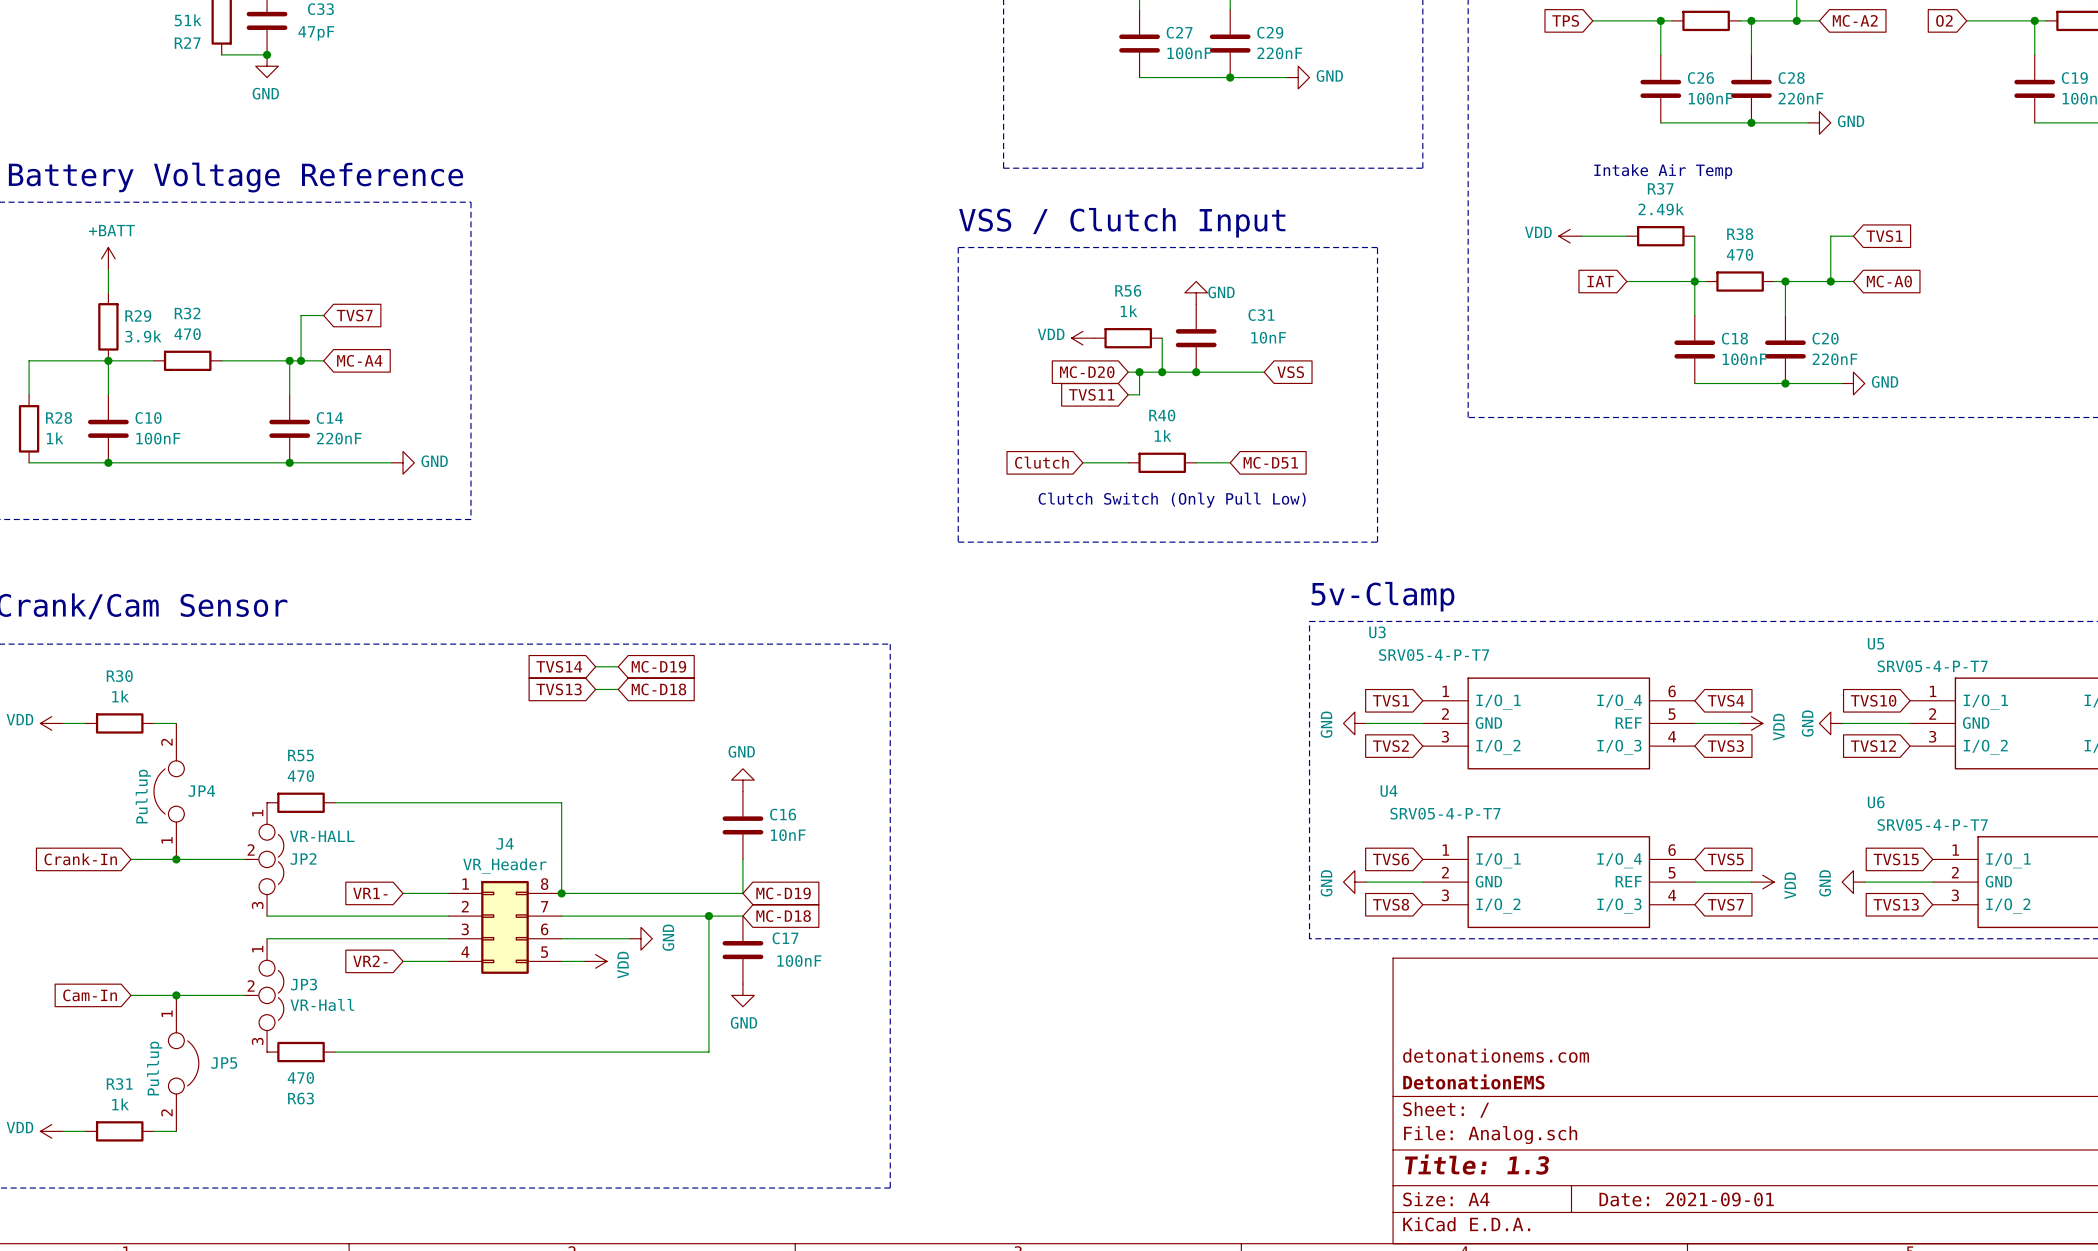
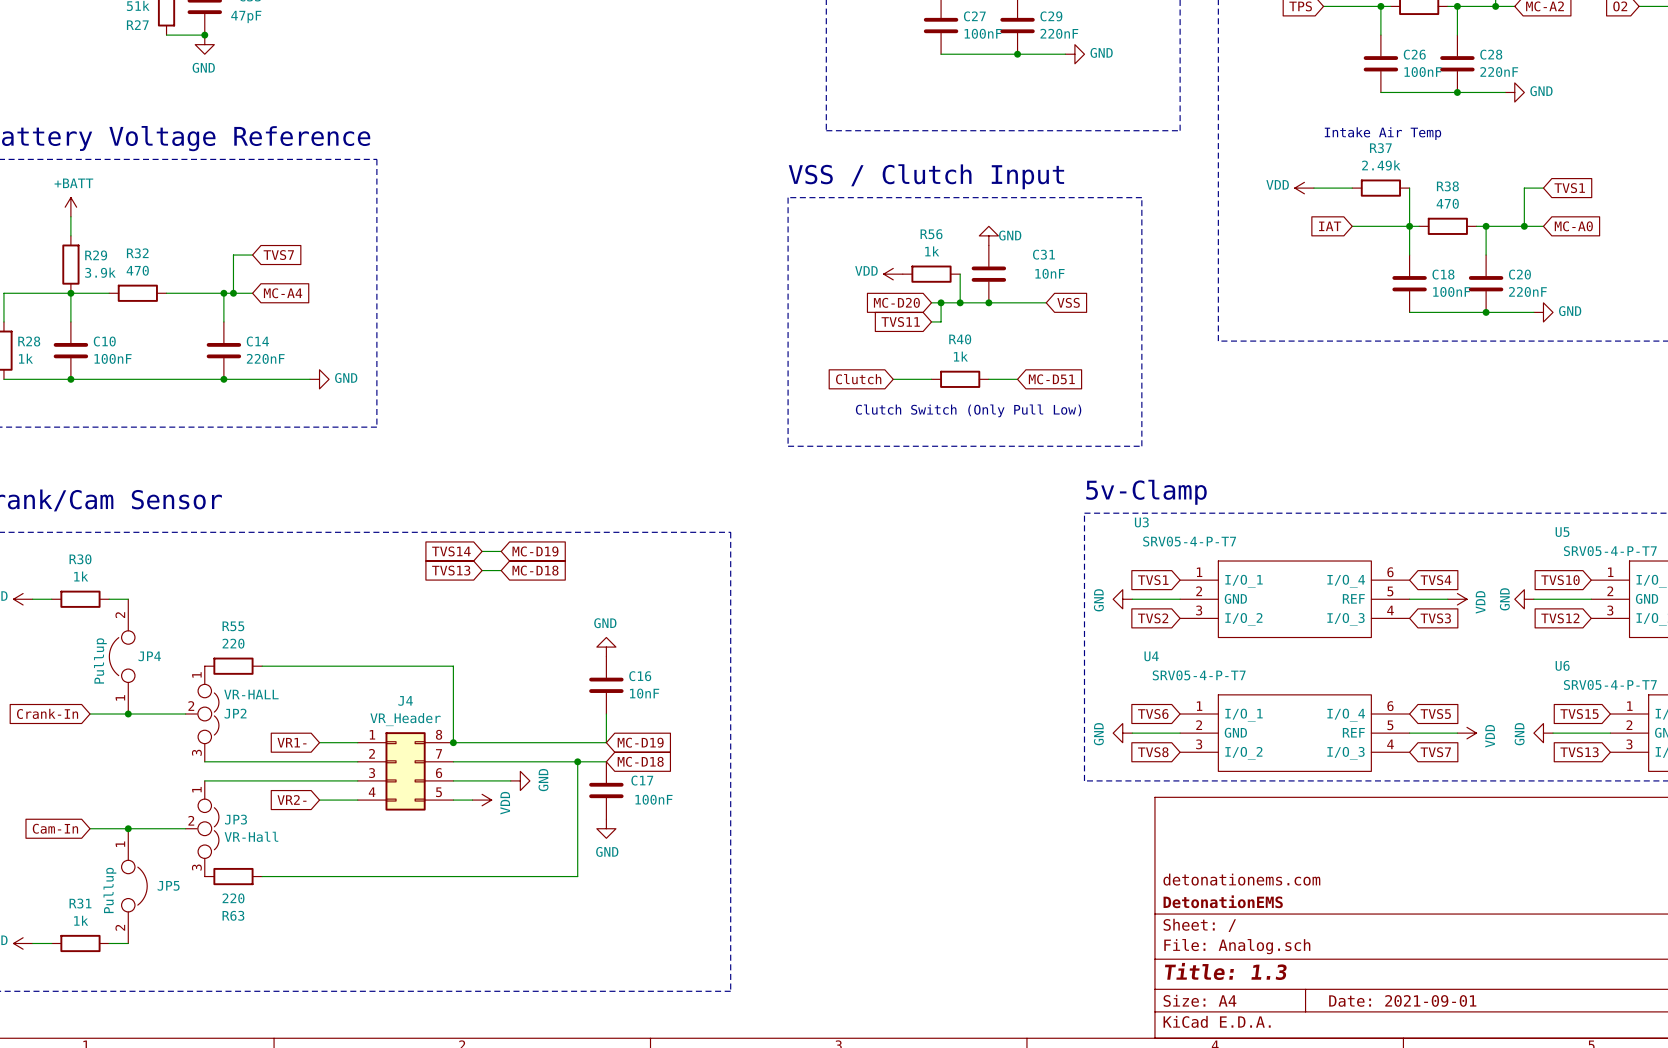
R55 value: 470 (300, 776) -> 220 (233, 643)
R63 value: 470 (300, 1077) -> 220 (233, 898)

